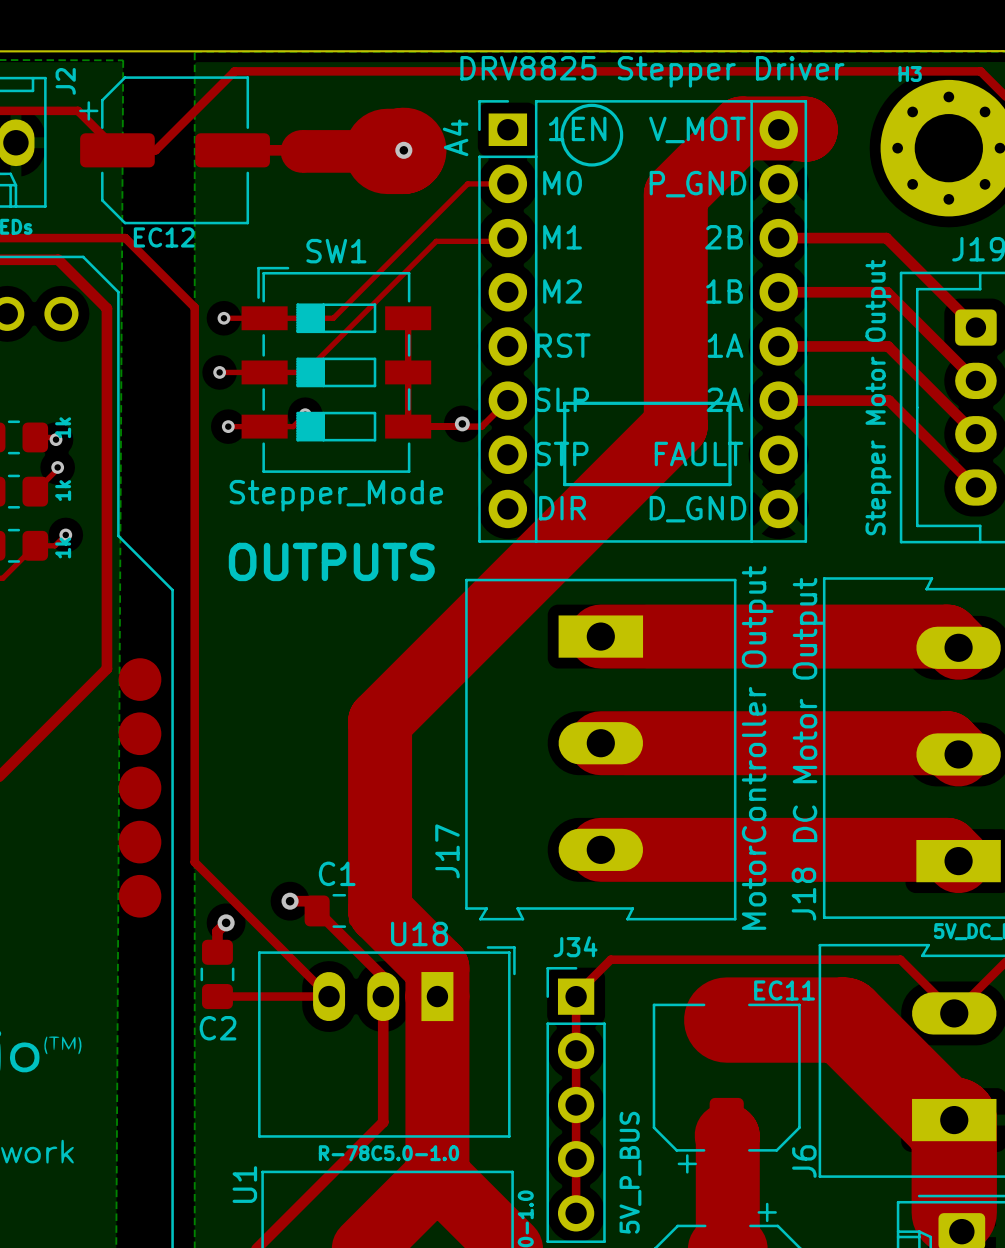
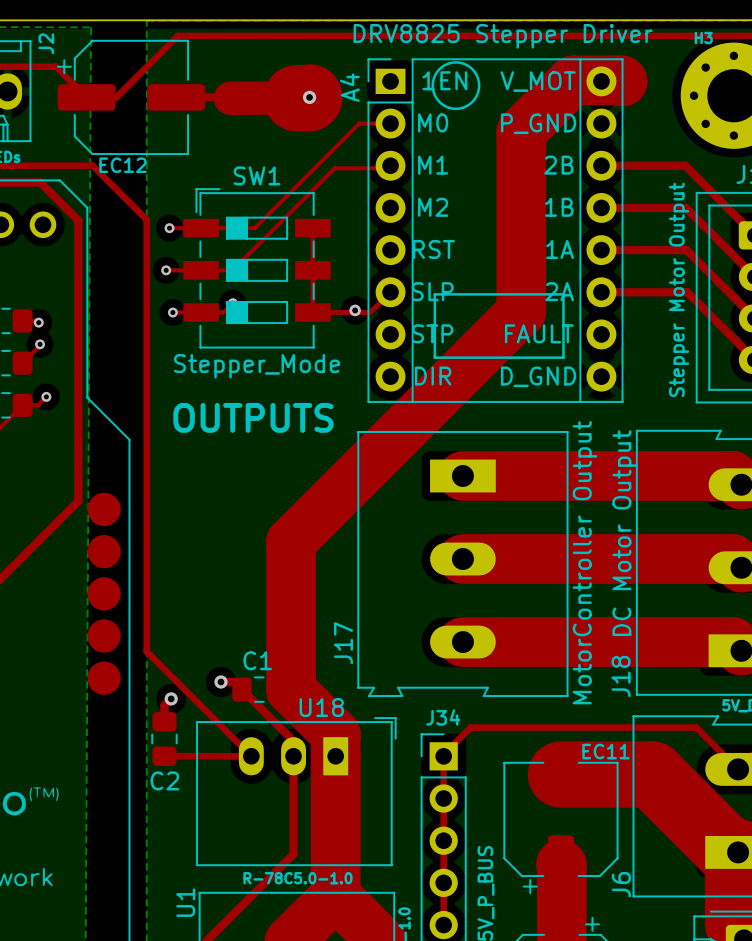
part value: 1k (63, 427) -> none
part value: 1k (63, 490) -> none
part value: 1k (63, 547) -> none

